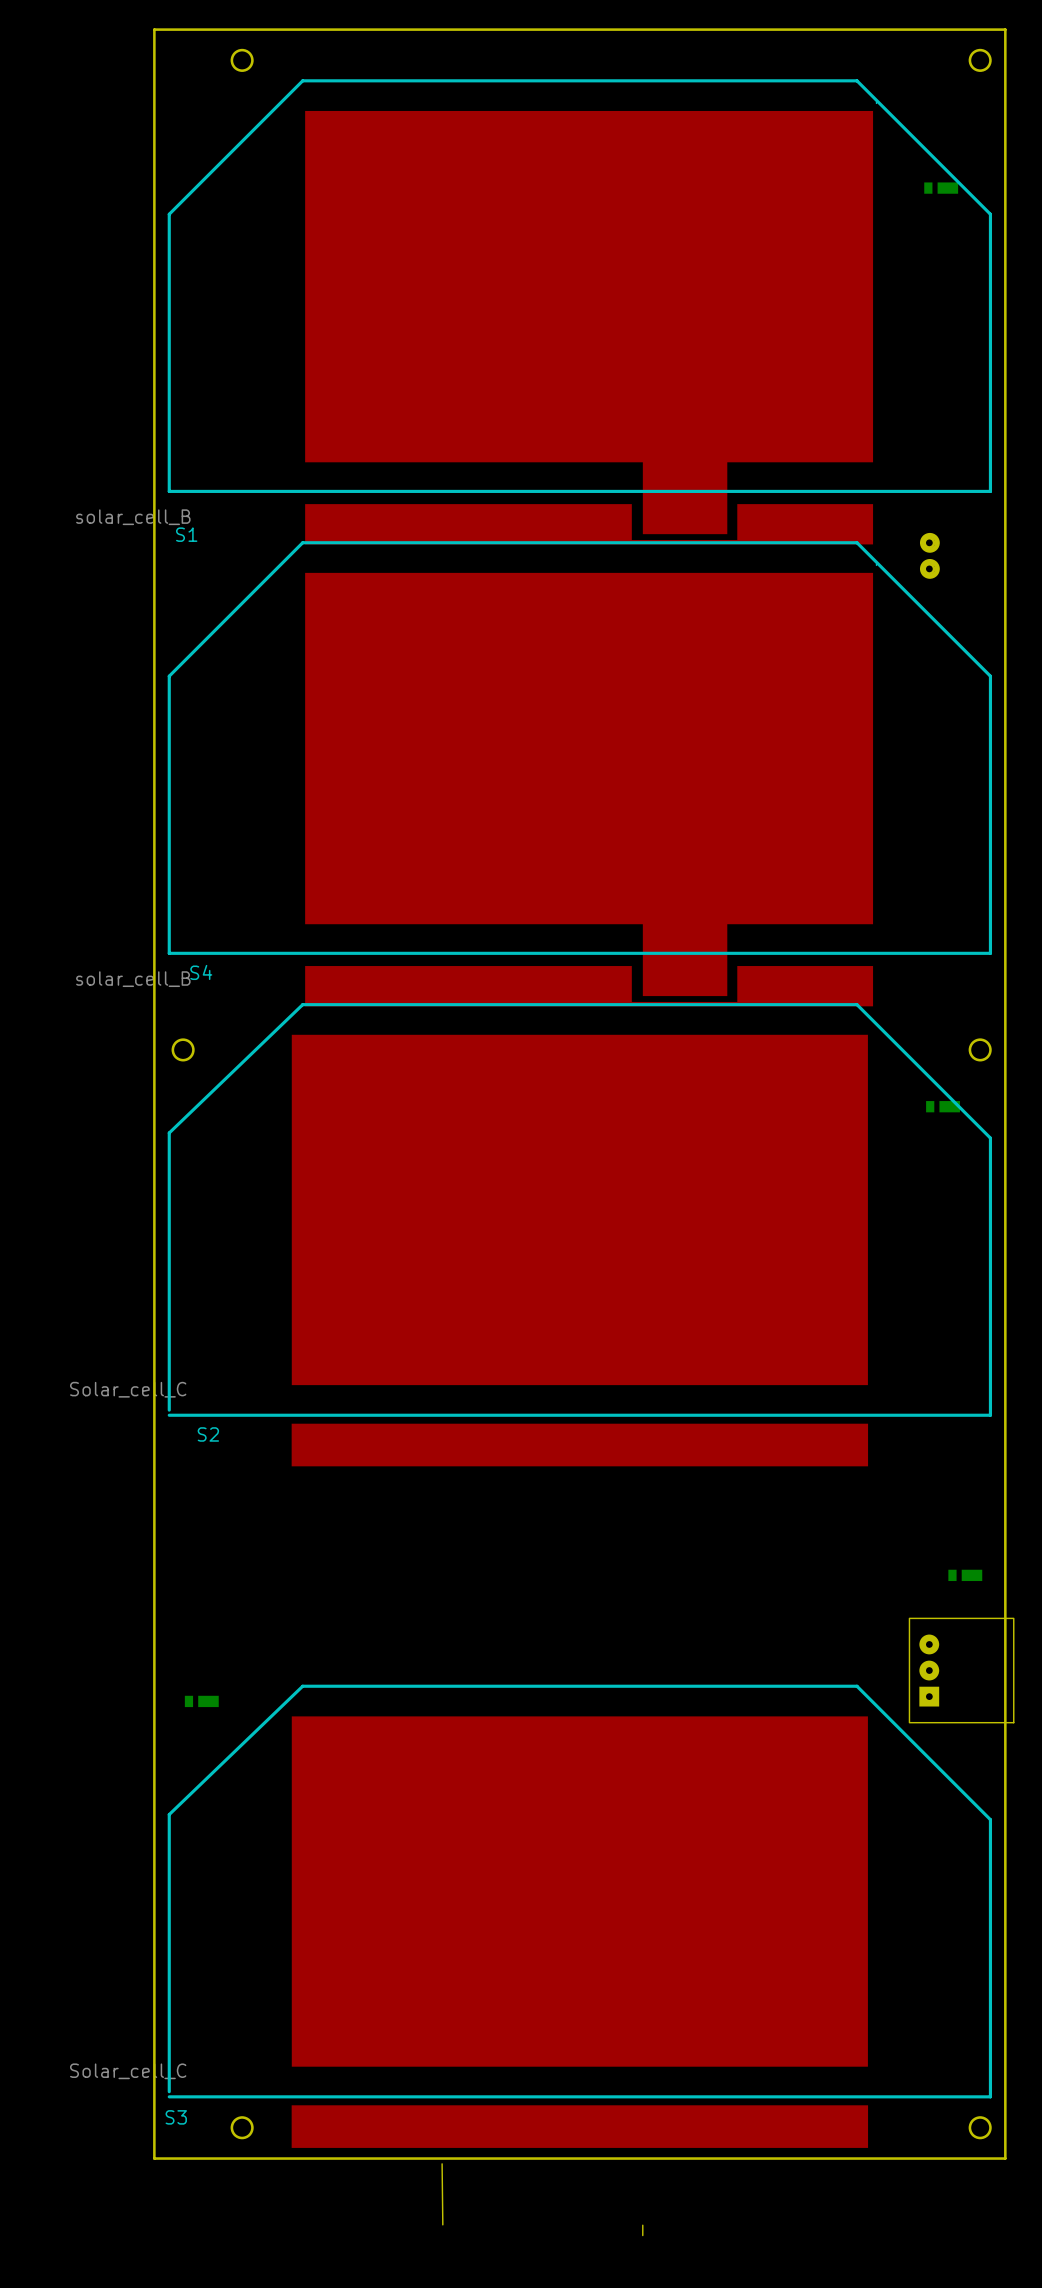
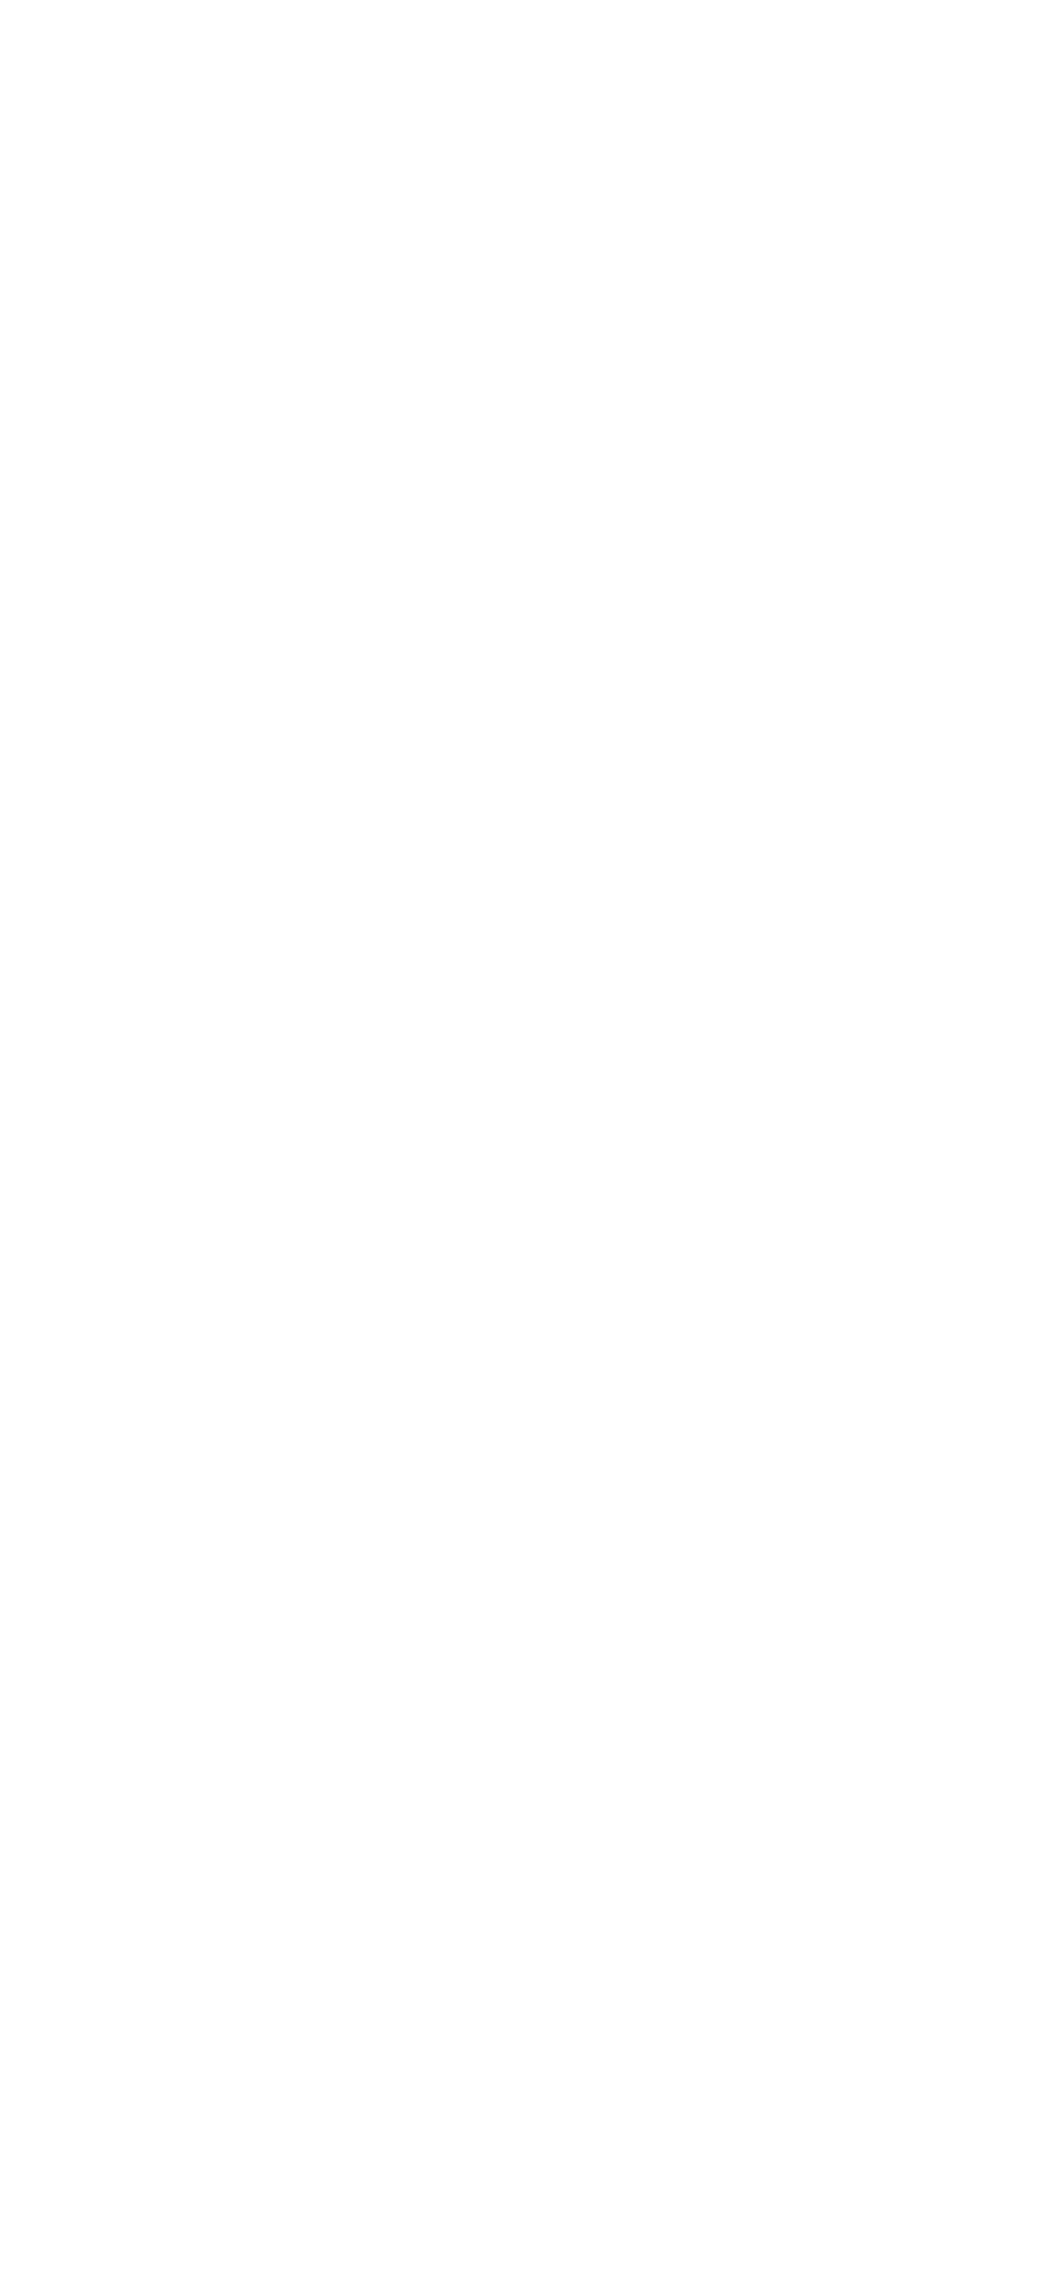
board edge: (154, 29) (154, 2158) (1005, 2158) (1005, 29) (154, 29) -> none
round board edge: [230, 48, 254, 72] -> none
round board edge: [968, 48, 992, 72] -> none
part: (941, 188) -> none
S1: solar_cell_B (579, 311) -> none
round board edge: [923, 536, 936, 549] -> none
part: (929, 555) -> none
round board edge: [923, 562, 936, 575] -> none
S4: solar_cell_B (579, 773) -> none
round board edge: [171, 1038, 195, 1062] -> none
round board edge: [968, 1038, 992, 1062] -> none
part: (943, 1106) -> none
S2: Solar_cell_C (579, 1234) -> none
part: (965, 1575) -> none
round board edge: [923, 1638, 936, 1651] -> none
round board edge: [923, 1664, 936, 1677] -> none
part: (961, 1670) -> none
round board edge: [923, 1690, 936, 1703] -> none
part: (201, 1701) -> none
S3: Solar_cell_C (579, 1916) -> none
round board edge: [230, 2116, 254, 2140] -> none
round board edge: [968, 2116, 992, 2140] -> none
board edge: (442, 2163) (442, 2224) -> none
board edge: (642, 2225) (642, 2235) -> none

